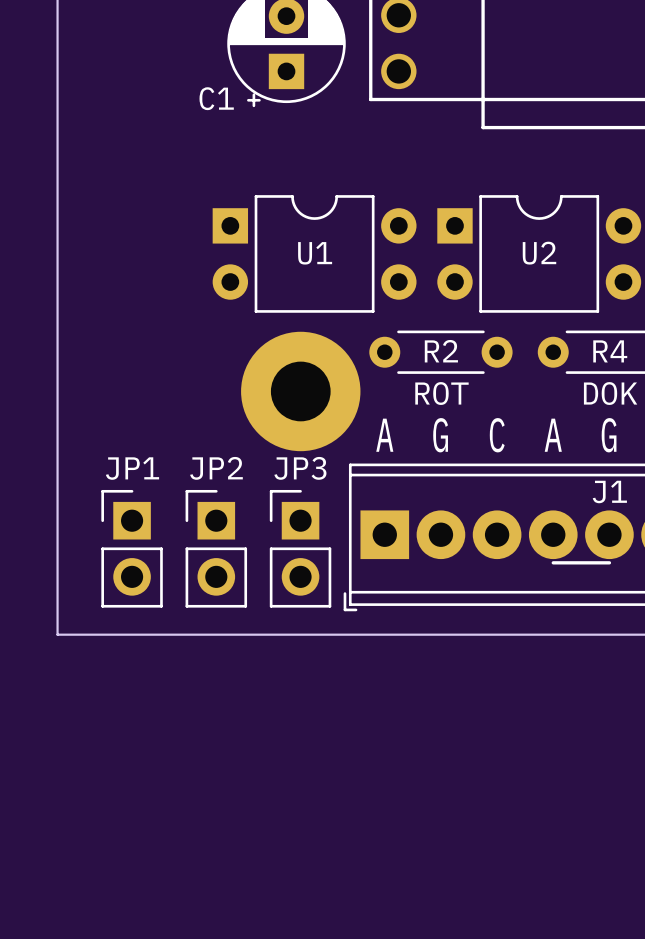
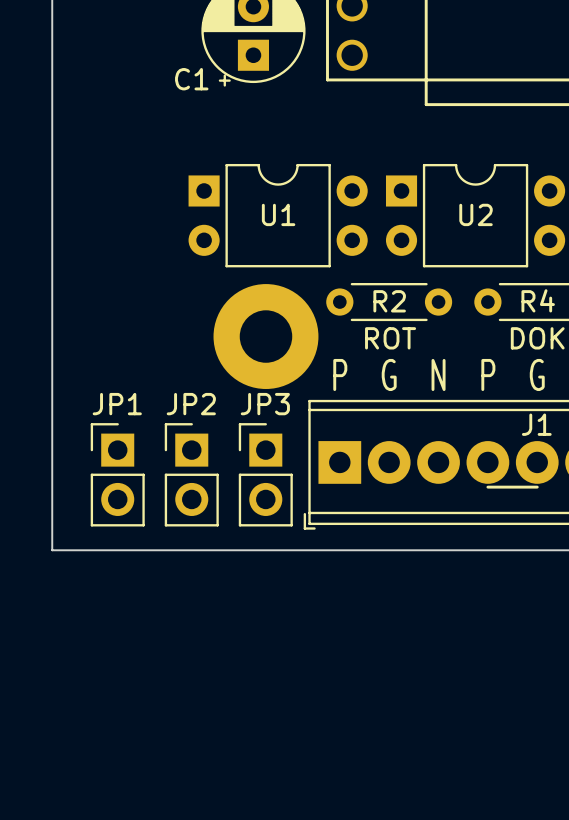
text: A (384, 435) -> P (340, 374)
text: C (497, 435) -> N (438, 374)
text: A (553, 435) -> P (488, 374)

